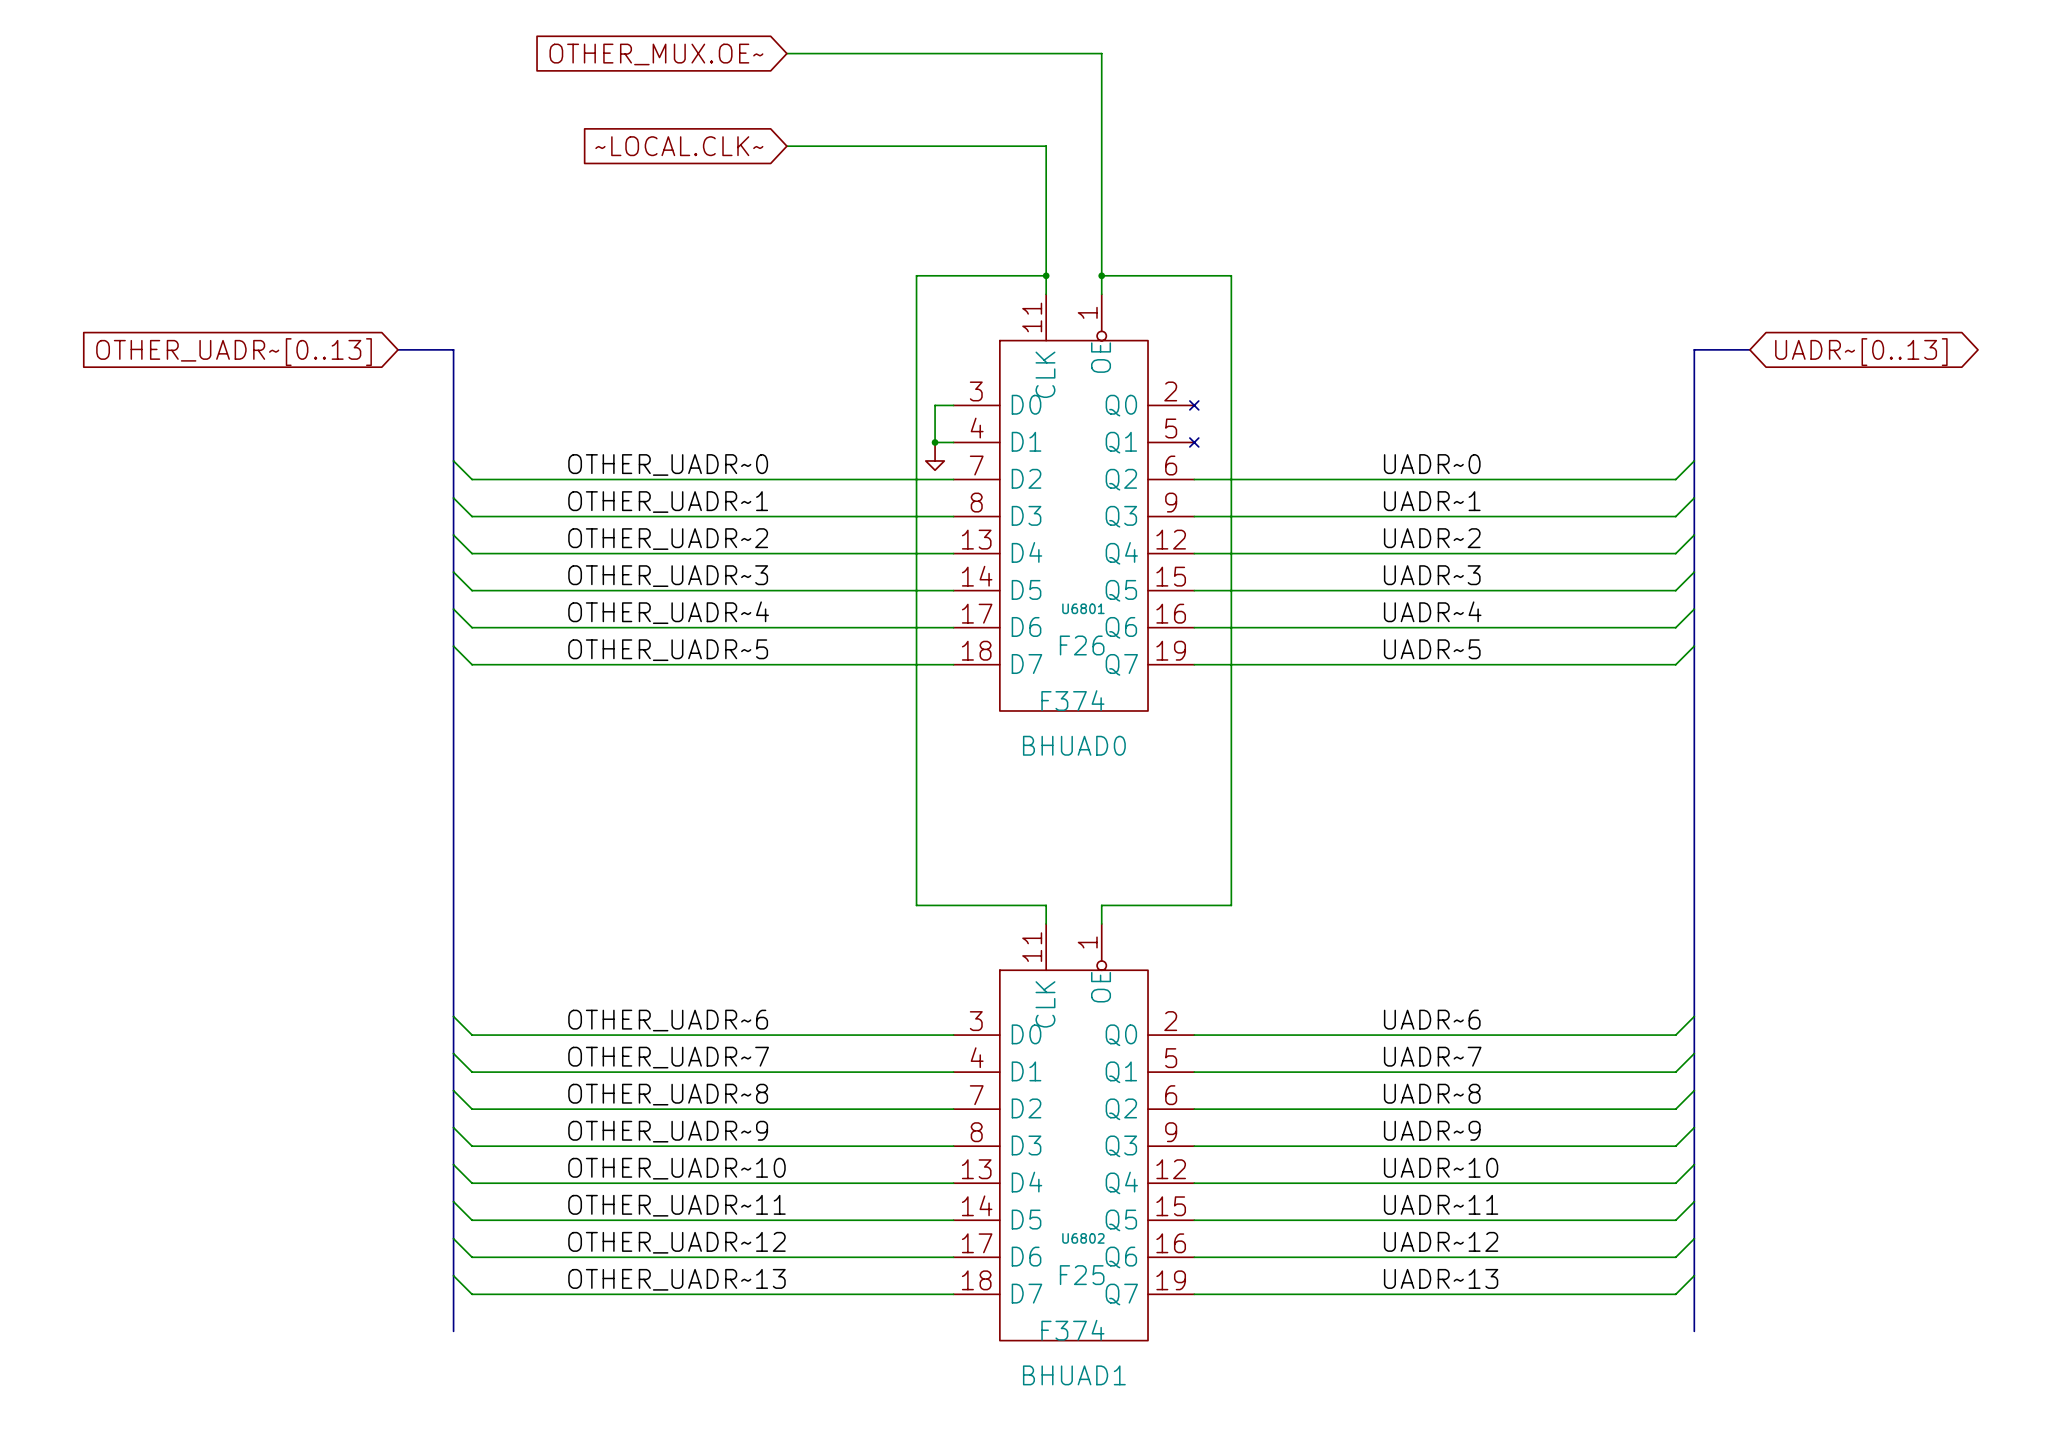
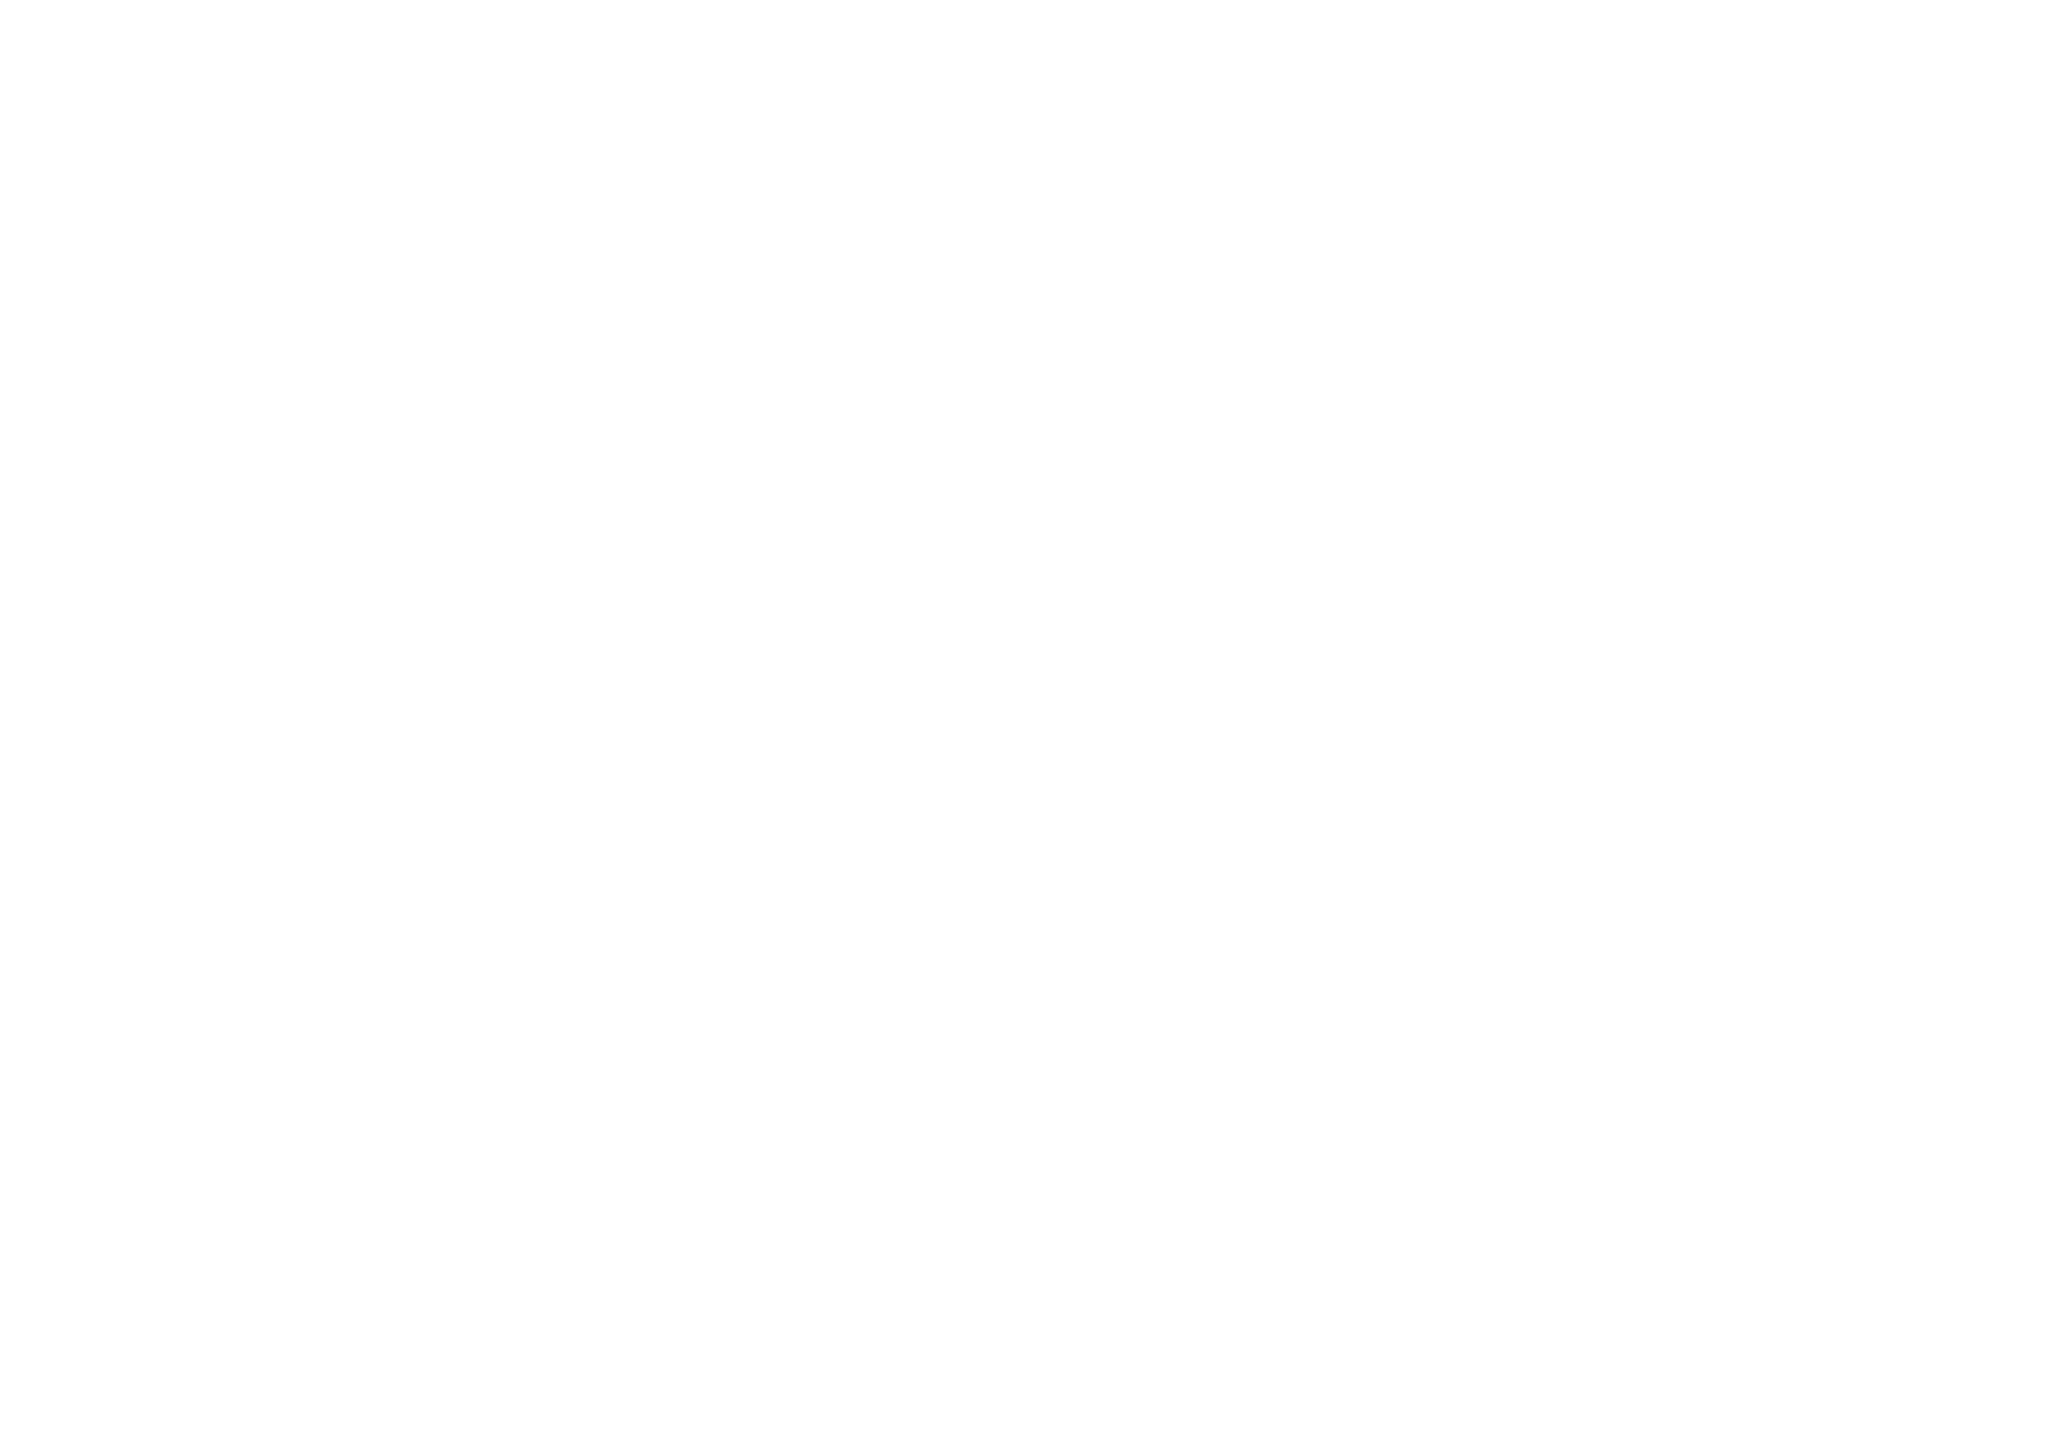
wire: (786, 53) (1101, 53) (1101, 294) -> none
global label: OTHER_MUX.OE~ (656, 54) -> none
global label: ~LOCAL.CLK~ (679, 146) -> none
wire: (786, 146) (1046, 146) (1046, 294) -> none
wire: (1046, 275) (916, 275) (916, 905) (1046, 905) (1046, 923) -> none
junction: (1046, 275) -> none
wire: (1101, 275) (1231, 275) (1231, 905) (1101, 905) (1101, 923) -> none
junction: (1101, 275) -> none
bus: (398, 349) (453, 349) (453, 1331) -> none
bus: (1749, 349) (1694, 349) (1694, 1331) -> none
global label: OTHER_UADR~[0..13] (234, 352) -> none
global label: UADR~[0..13] (1861, 352) -> none
wire: (953, 405) (935, 405) (935, 442) (953, 442) -> none
no-connect mark: (1194, 405) -> none
junction: (935, 442) -> none
no-connect mark: (1194, 442) -> none
power symbol: (935, 456) -> none
wire: (453, 460) (472, 479) (953, 479) -> none
wire: (1694, 460) (1675, 479) (1194, 479) -> none
label: OTHER_UADR~0 (668, 464) -> none
label: UADR~0 (1432, 464) -> none
wire: (453, 498) (472, 516) (953, 516) -> none
wire: (1694, 498) (1675, 516) (1194, 516) -> none
label: UADR~1 (1432, 501) -> none
label: OTHER_UADR~1 (668, 502) -> none
U6801: F374 (1073, 502) -> none
wire: (453, 535) (472, 553) (953, 553) -> none
wire: (1694, 535) (1675, 553) (1194, 553) -> none
label: UADR~2 (1432, 538) -> none
label: OTHER_UADR~2 (668, 539) -> none
wire: (453, 572) (472, 590) (953, 590) -> none
wire: (1694, 572) (1675, 590) (1194, 590) -> none
label: UADR~3 (1432, 575) -> none
label: OTHER_UADR~3 (668, 576) -> none
wire: (453, 609) (472, 627) (953, 627) -> none
wire: (1694, 609) (1675, 627) (1194, 627) -> none
label: UADR~4 (1432, 611) -> none
label: OTHER_UADR~4 (668, 612) -> none
wire: (453, 646) (472, 664) (953, 664) -> none
wire: (1694, 646) (1675, 664) (1194, 664) -> none
label: UADR~5 (1432, 649) -> none
label: OTHER_UADR~5 (668, 650) -> none
wire: (453, 1016) (472, 1035) (953, 1035) -> none
wire: (1694, 1016) (1675, 1035) (1194, 1035) -> none
label: UADR~6 (1432, 1019) -> none
label: OTHER_UADR~6 (668, 1020) -> none
wire: (453, 1053) (472, 1072) (953, 1072) -> none
wire: (1694, 1053) (1675, 1072) (1194, 1072) -> none
label: UADR~7 (1432, 1056) -> none
label: OTHER_UADR~7 (668, 1057) -> none
wire: (453, 1090) (472, 1109) (953, 1109) -> none
wire: (1694, 1090) (1675, 1109) (1194, 1109) -> none
label: UADR~8 (1432, 1093) -> none
label: OTHER_UADR~8 (668, 1094) -> none
wire: (453, 1127) (472, 1146) (953, 1146) -> none
wire: (1694, 1127) (1675, 1146) (1194, 1146) -> none
label: UADR~9 (1432, 1130) -> none
label: OTHER_UADR~9 (668, 1131) -> none
U6802: F374 (1073, 1132) -> none
wire: (453, 1164) (472, 1183) (953, 1183) -> none
wire: (1694, 1164) (1675, 1183) (1194, 1183) -> none
label: UADR~10 (1441, 1167) -> none
label: OTHER_UADR~10 (676, 1168) -> none
wire: (453, 1201) (472, 1220) (953, 1220) -> none
wire: (1694, 1201) (1675, 1220) (1194, 1220) -> none
label: UADR~11 (1441, 1204) -> none
label: OTHER_UADR~11 (676, 1205) -> none
wire: (453, 1238) (472, 1257) (953, 1257) -> none
wire: (1694, 1238) (1675, 1257) (1194, 1257) -> none
label: UADR~12 (1441, 1241) -> none
label: OTHER_UADR~12 (676, 1242) -> none
wire: (453, 1275) (472, 1294) (953, 1294) -> none
wire: (1694, 1275) (1675, 1294) (1194, 1294) -> none
label: UADR~13 (1441, 1278) -> none
label: OTHER_UADR~13 (676, 1279) -> none

